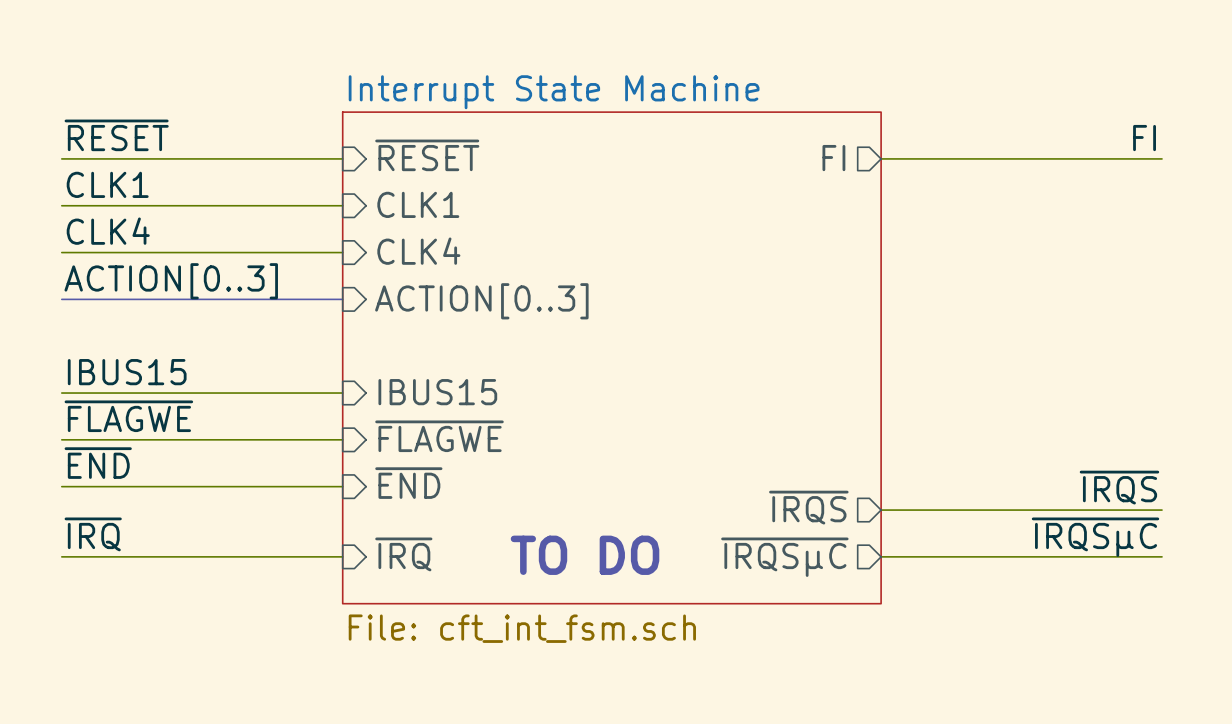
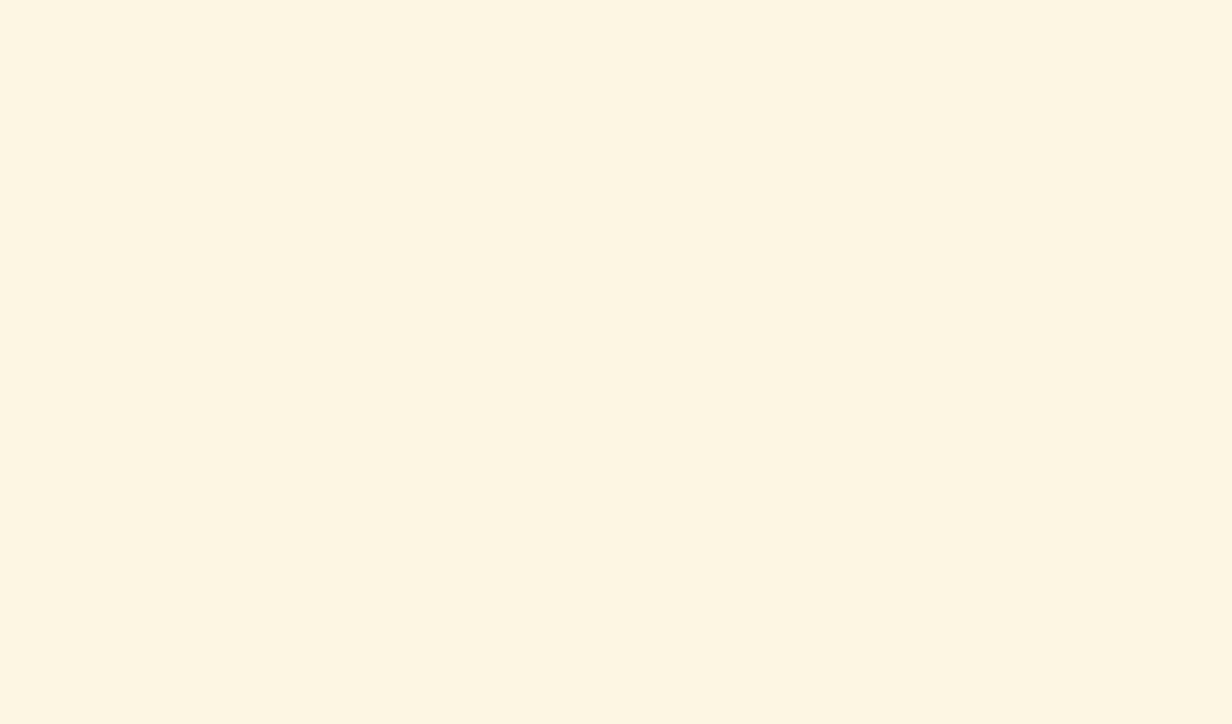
label: ~{RESET} (116, 135) -> none
label: FI (1144, 138) -> none
sheet pin: ~{RESET} (427, 155) -> none
wire: (61, 158) (342, 158) -> none
sheet pin: FI (833, 158) -> none
wire: (881, 158) (1162, 158) -> none
label: CLK1 (107, 184) -> none
sheet pin: CLK1 (418, 204) -> none
wire: (61, 205) (342, 205) -> none
label: CLK4 (108, 231) -> none
sheet pin: CLK4 (418, 251) -> none
wire: (61, 252) (342, 252) -> none
label: ACTION[0..3] (171, 281) -> none
bus: (61, 299) (342, 299) -> none
sheet pin: ACTION[0..3] (481, 301) -> none
sheet Interrupt State Machine: File: cft_int_fsm.sch (611, 357) -> none
label: IBUS15 (127, 372) -> none
sheet pin: IBUS15 (437, 392) -> none
wire: (61, 393) (342, 393) -> none
label: ~{FLAGWE} (128, 416) -> none
sheet pin: ~{FLAGWE} (439, 436) -> none
wire: (61, 439) (342, 439) -> none
label: ~{END} (98, 463) -> none
sheet pin: ~{END} (408, 483) -> none
wire: (61, 486) (342, 486) -> none
label: ~{IRQS} (1119, 487) -> none
sheet pin: ~{IRQS} (808, 507) -> none
wire: (881, 510) (1162, 510) -> none
label: ~{IRQ} (93, 534) -> none
label: ~{IRQSµC} (1095, 537) -> none
sheet pin: ~{IRQ} (403, 554) -> none
text: TO DO (585, 555) -> none
wire: (61, 556) (342, 556) -> none
wire: (881, 556) (1162, 556) -> none
sheet pin: ~{IRQSµC} (784, 557) -> none

